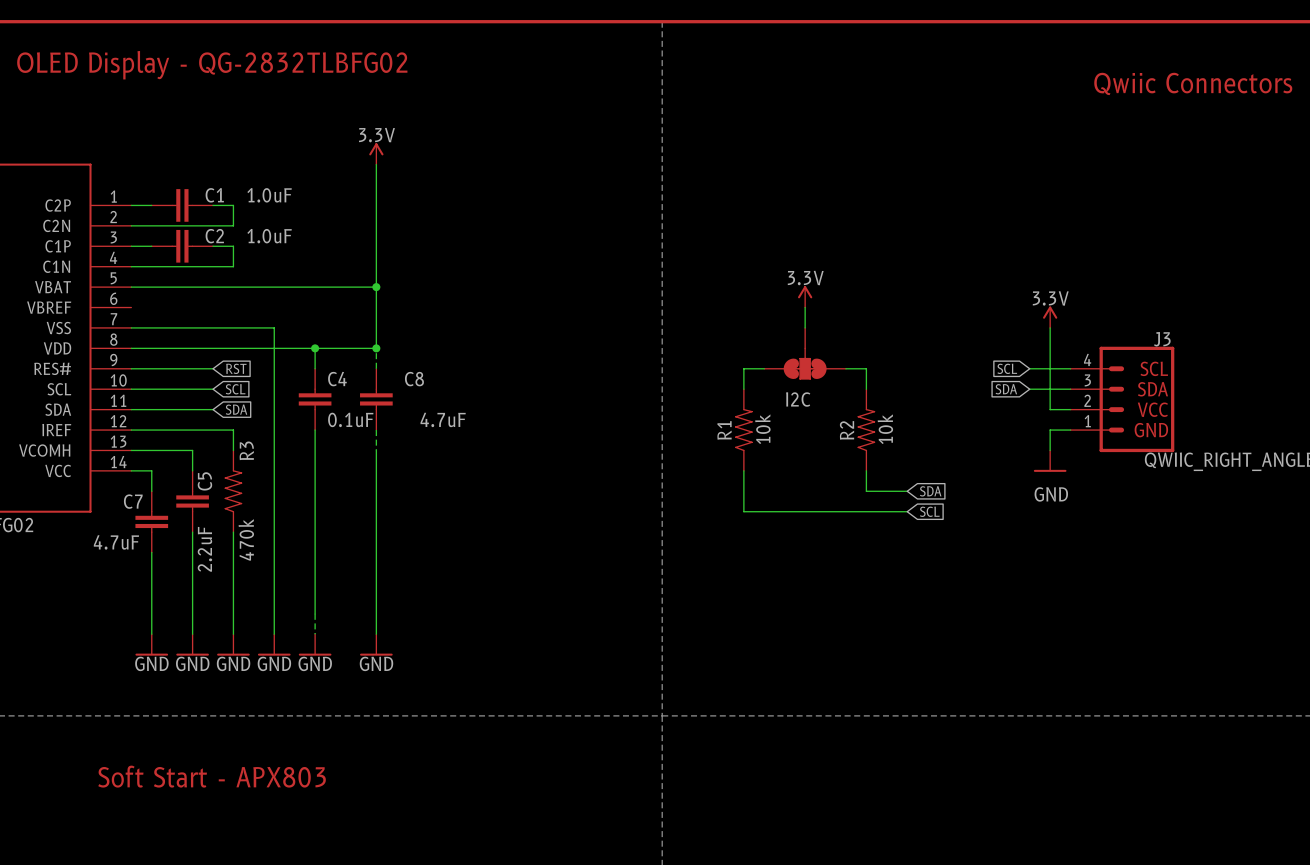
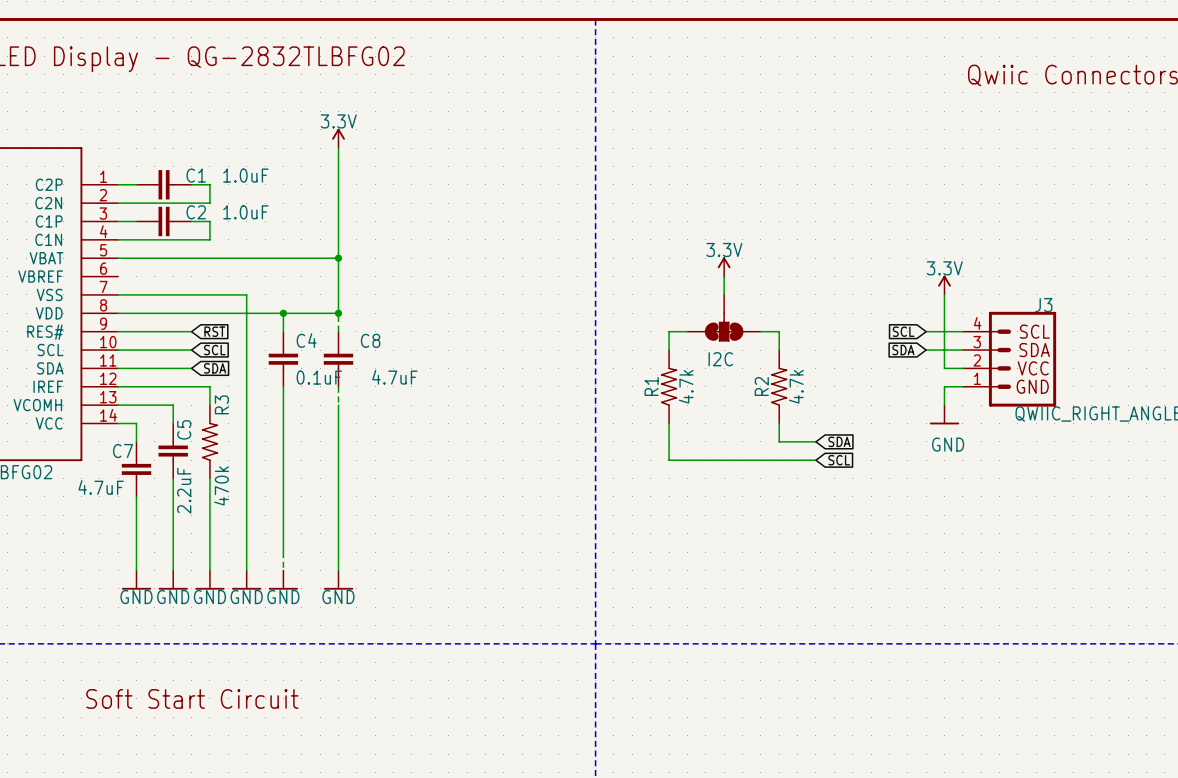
R1 value: 10k (762, 429) -> 4.7k (686, 386)
R2 value: 10k (885, 429) -> 4.7k (796, 386)
text: Soft Start - APX803 (212, 776) -> Soft Start Circuit (192, 698)

